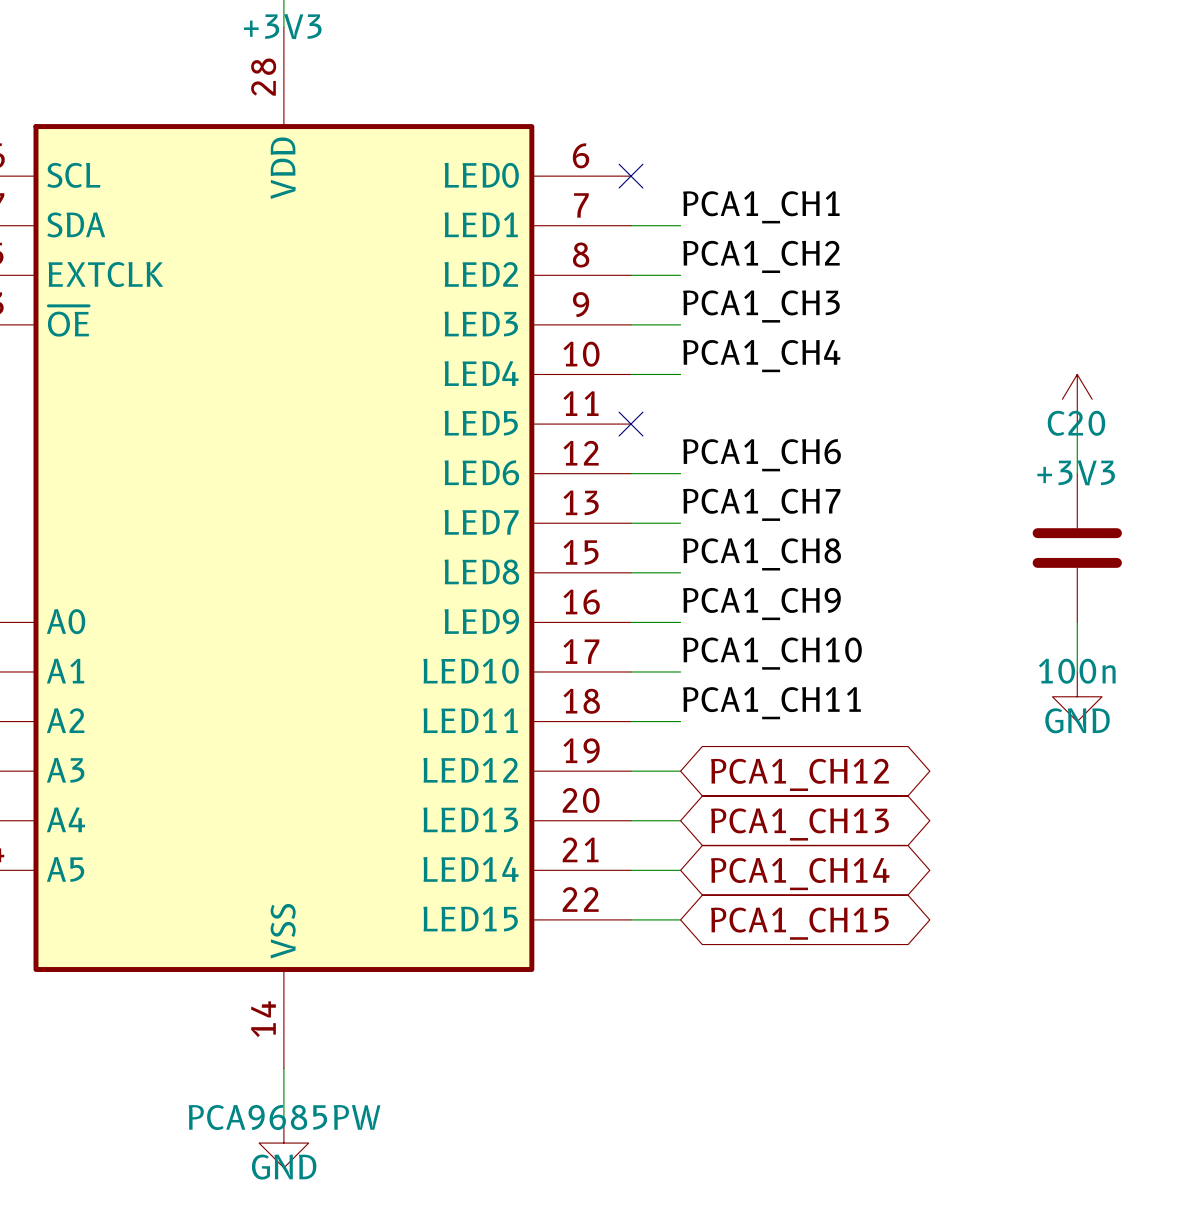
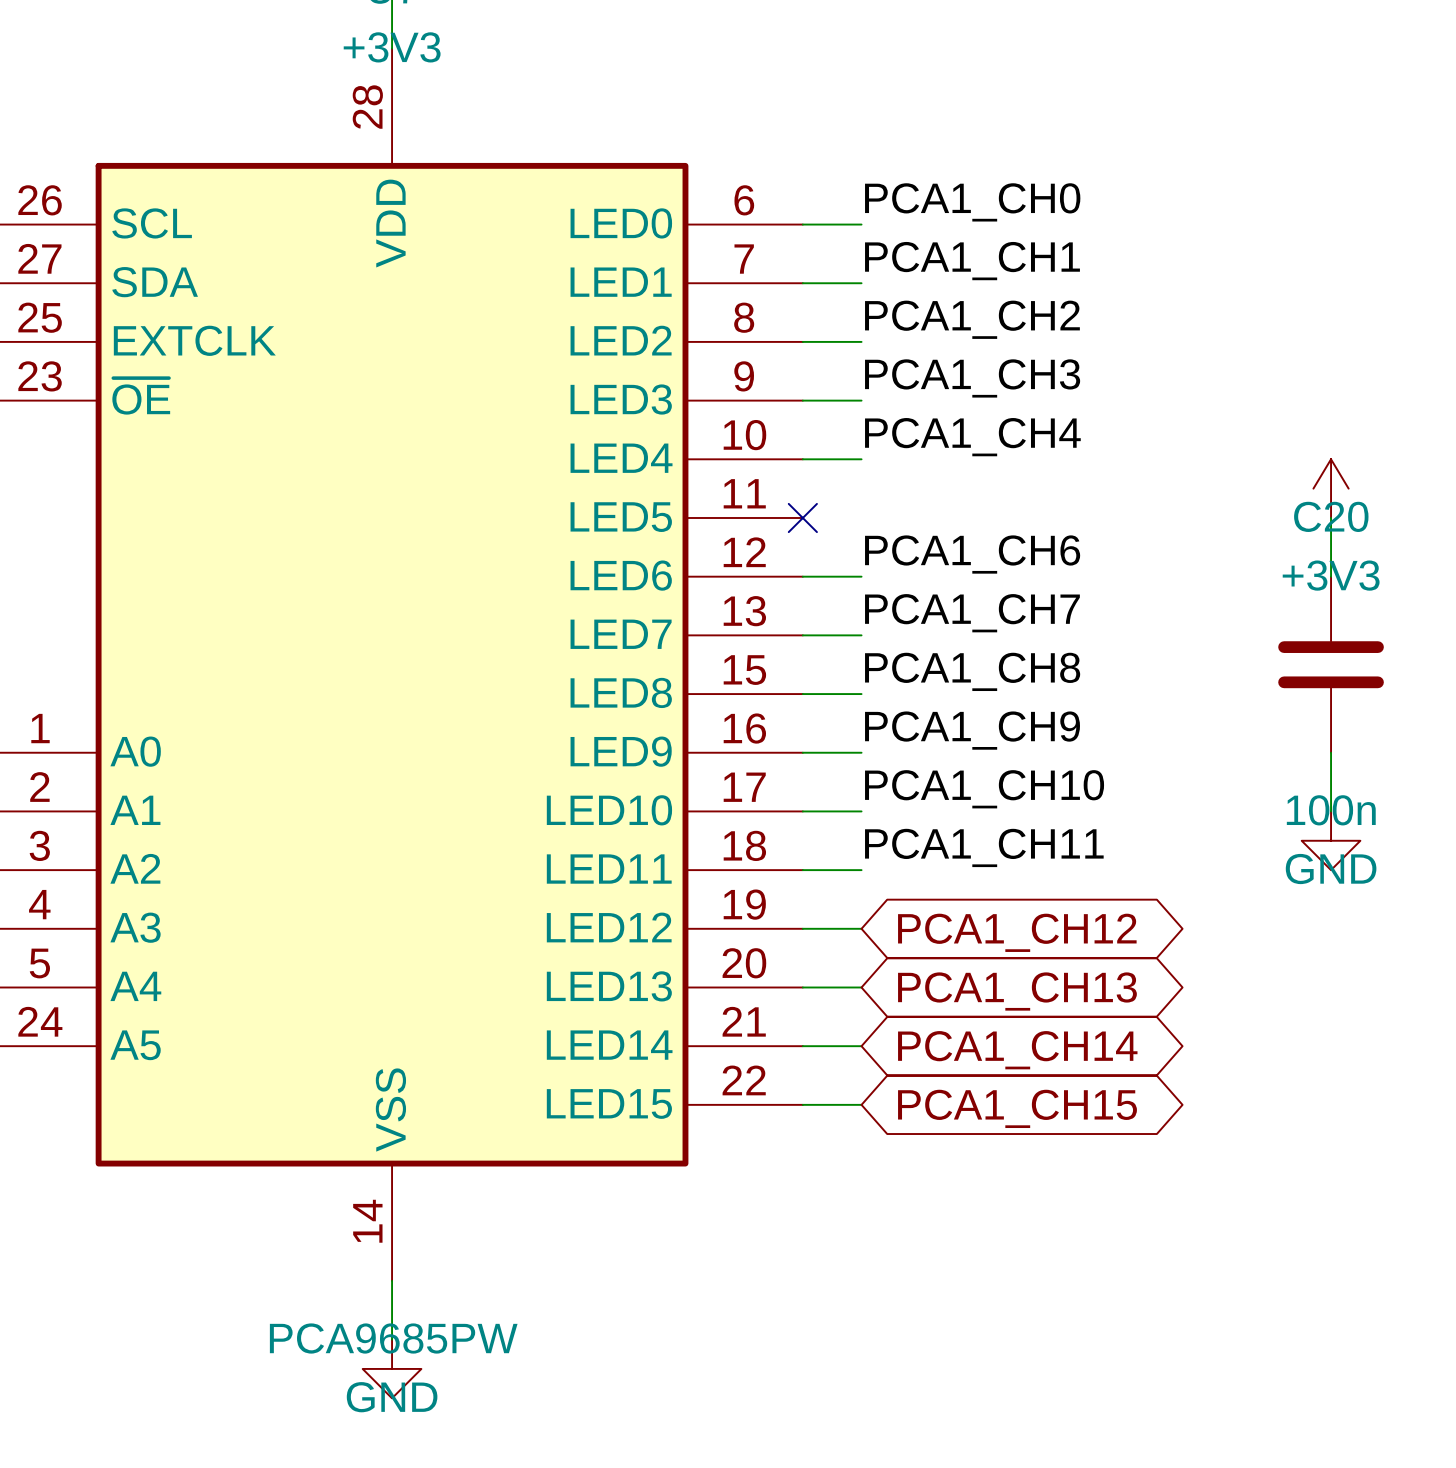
label: none -> PCA1_CH0 (972, 202)
wire: none -> (802, 224) (861, 224)
no-connect mark: (631, 176) -> none

